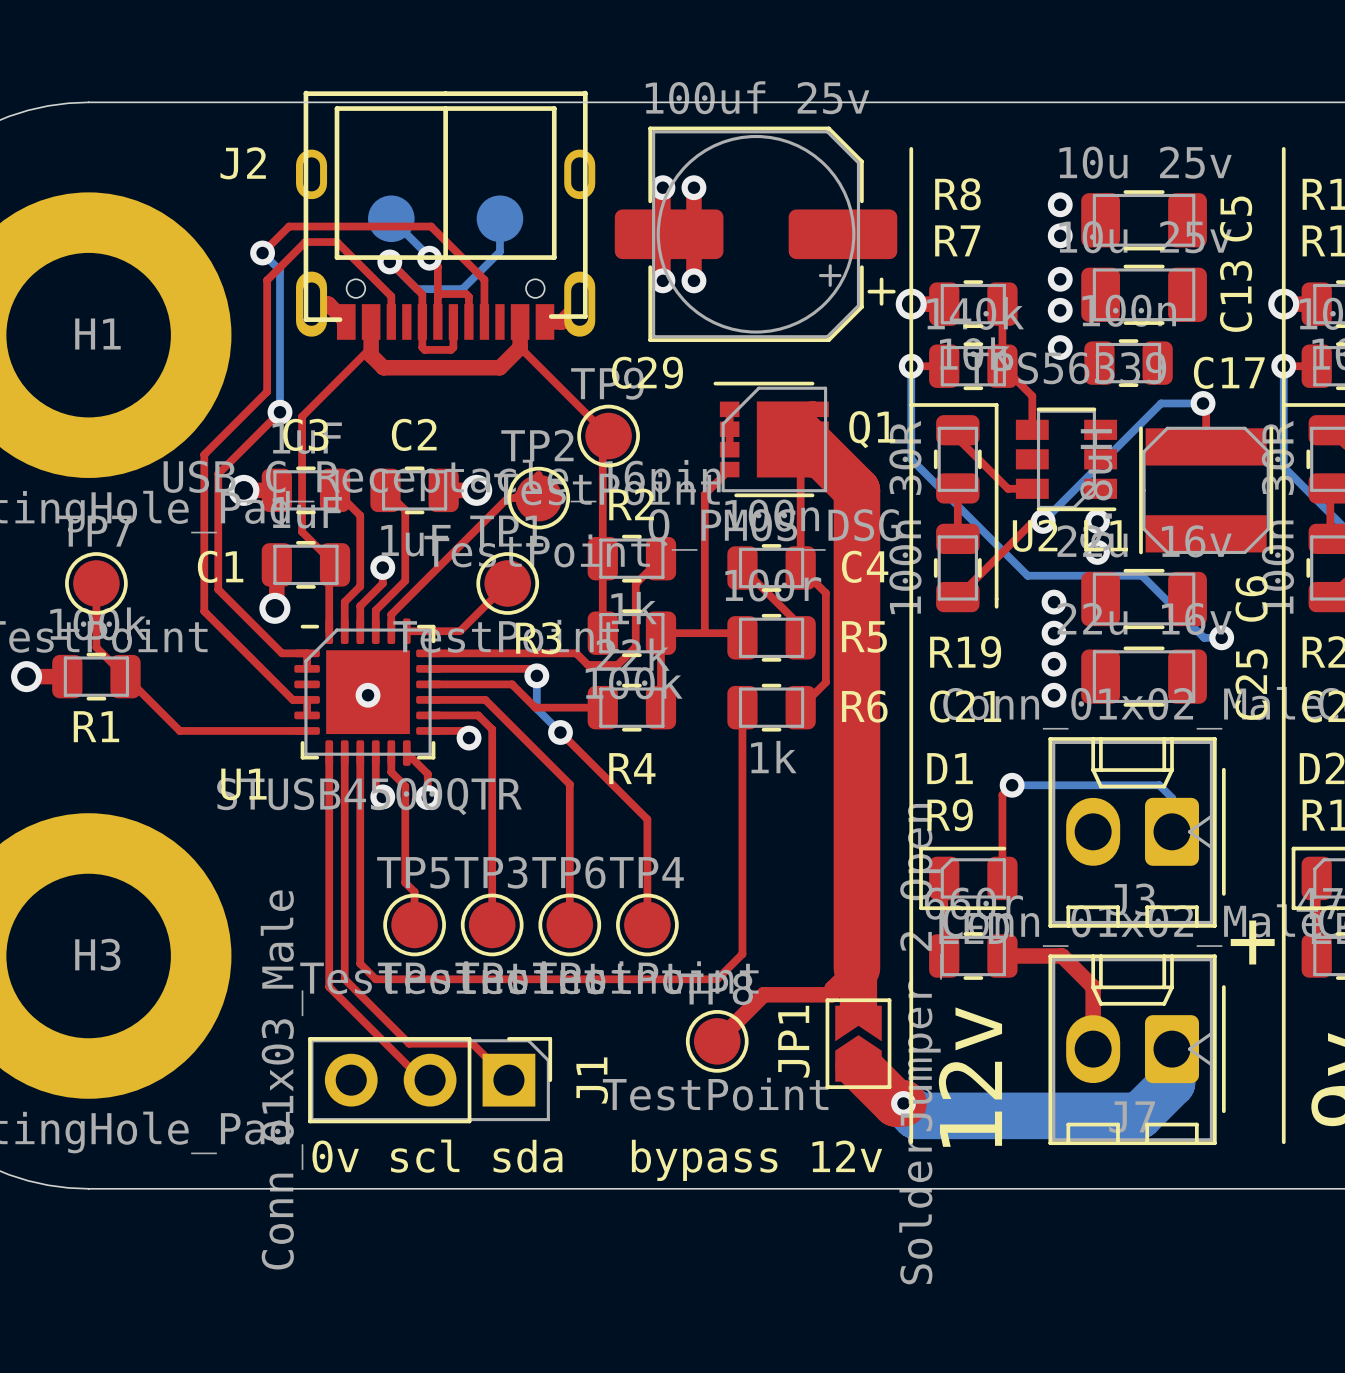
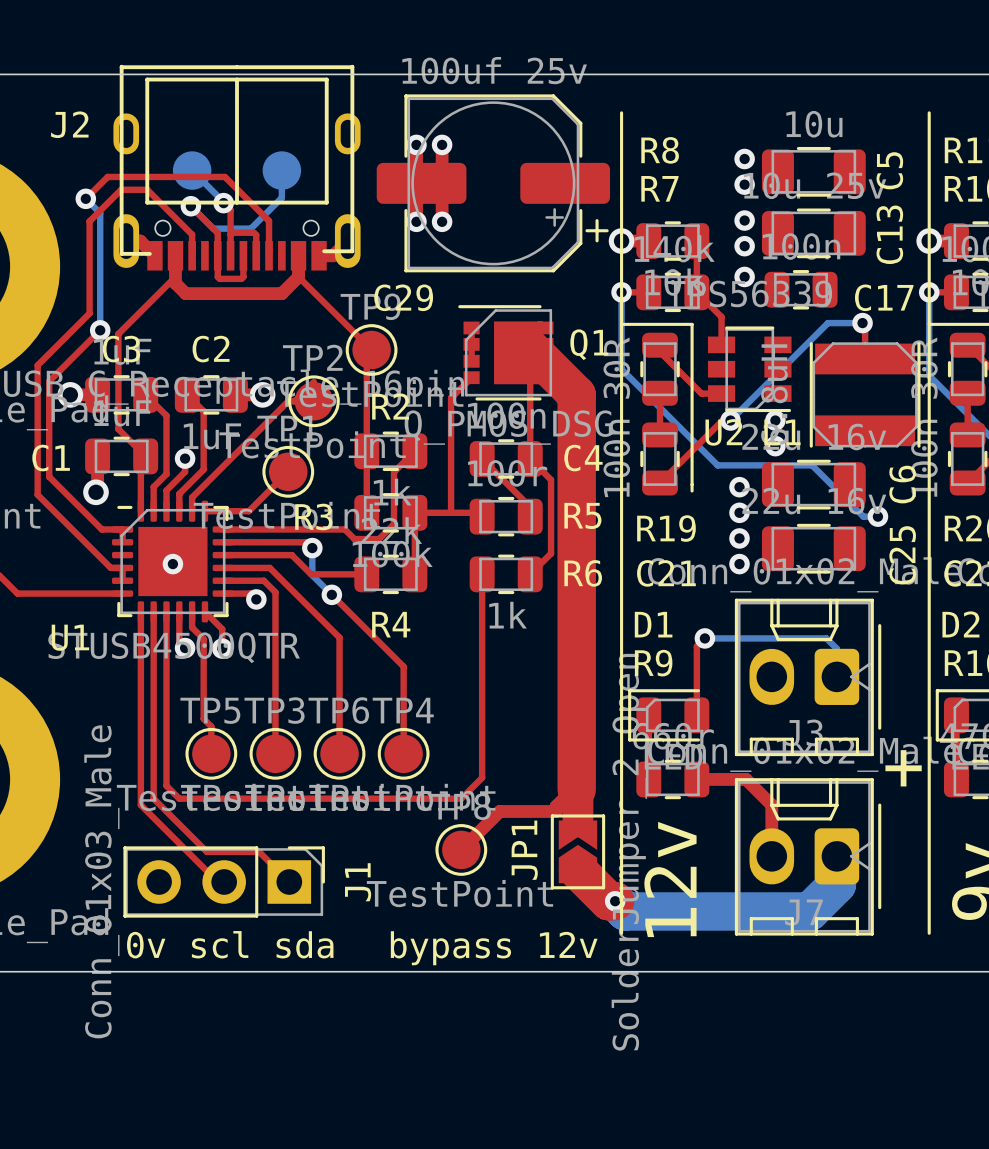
C5 value: 10u 25v (1145, 162) -> 10u (814, 124)

